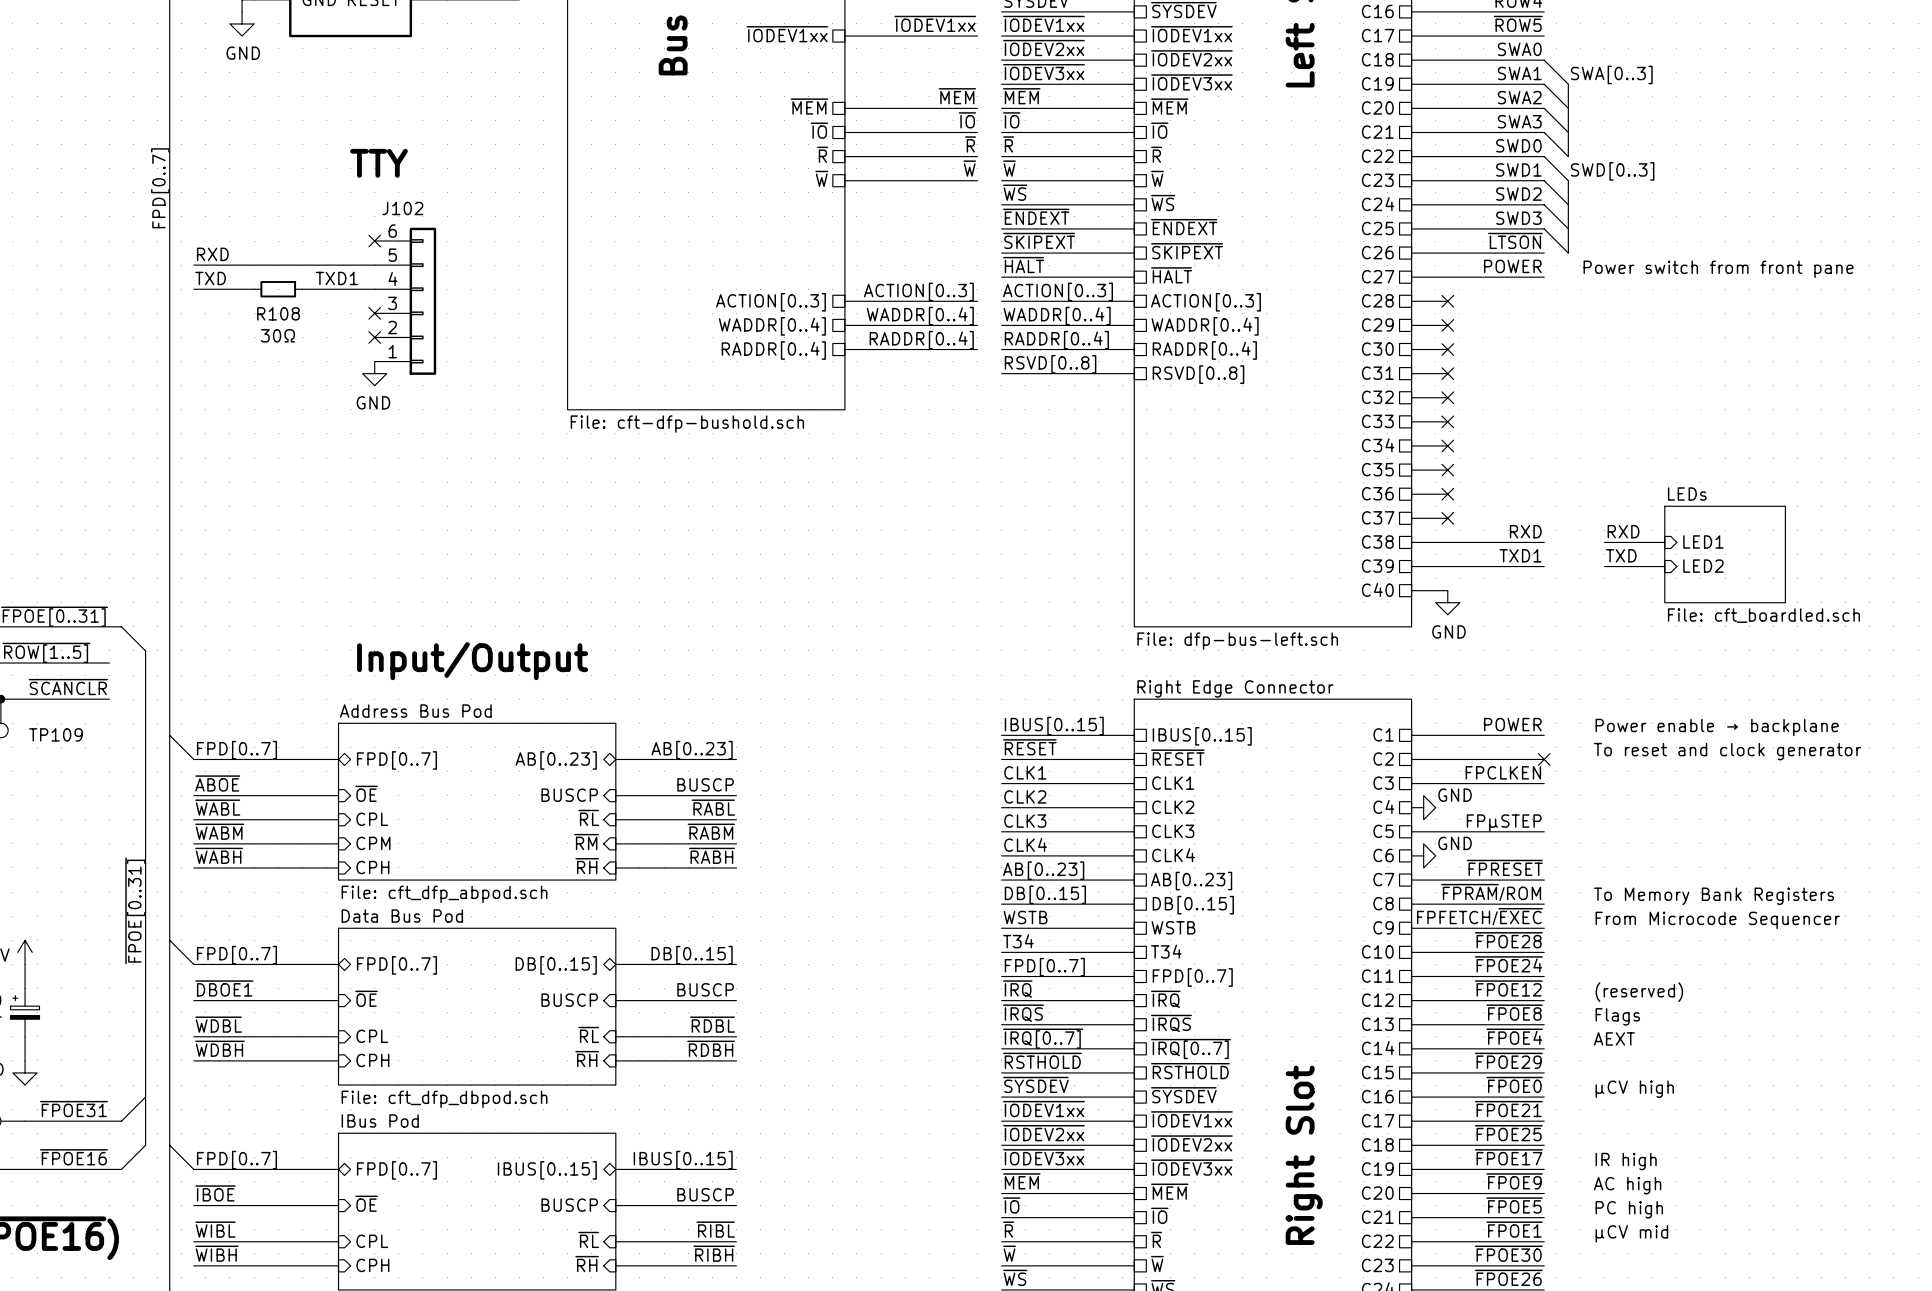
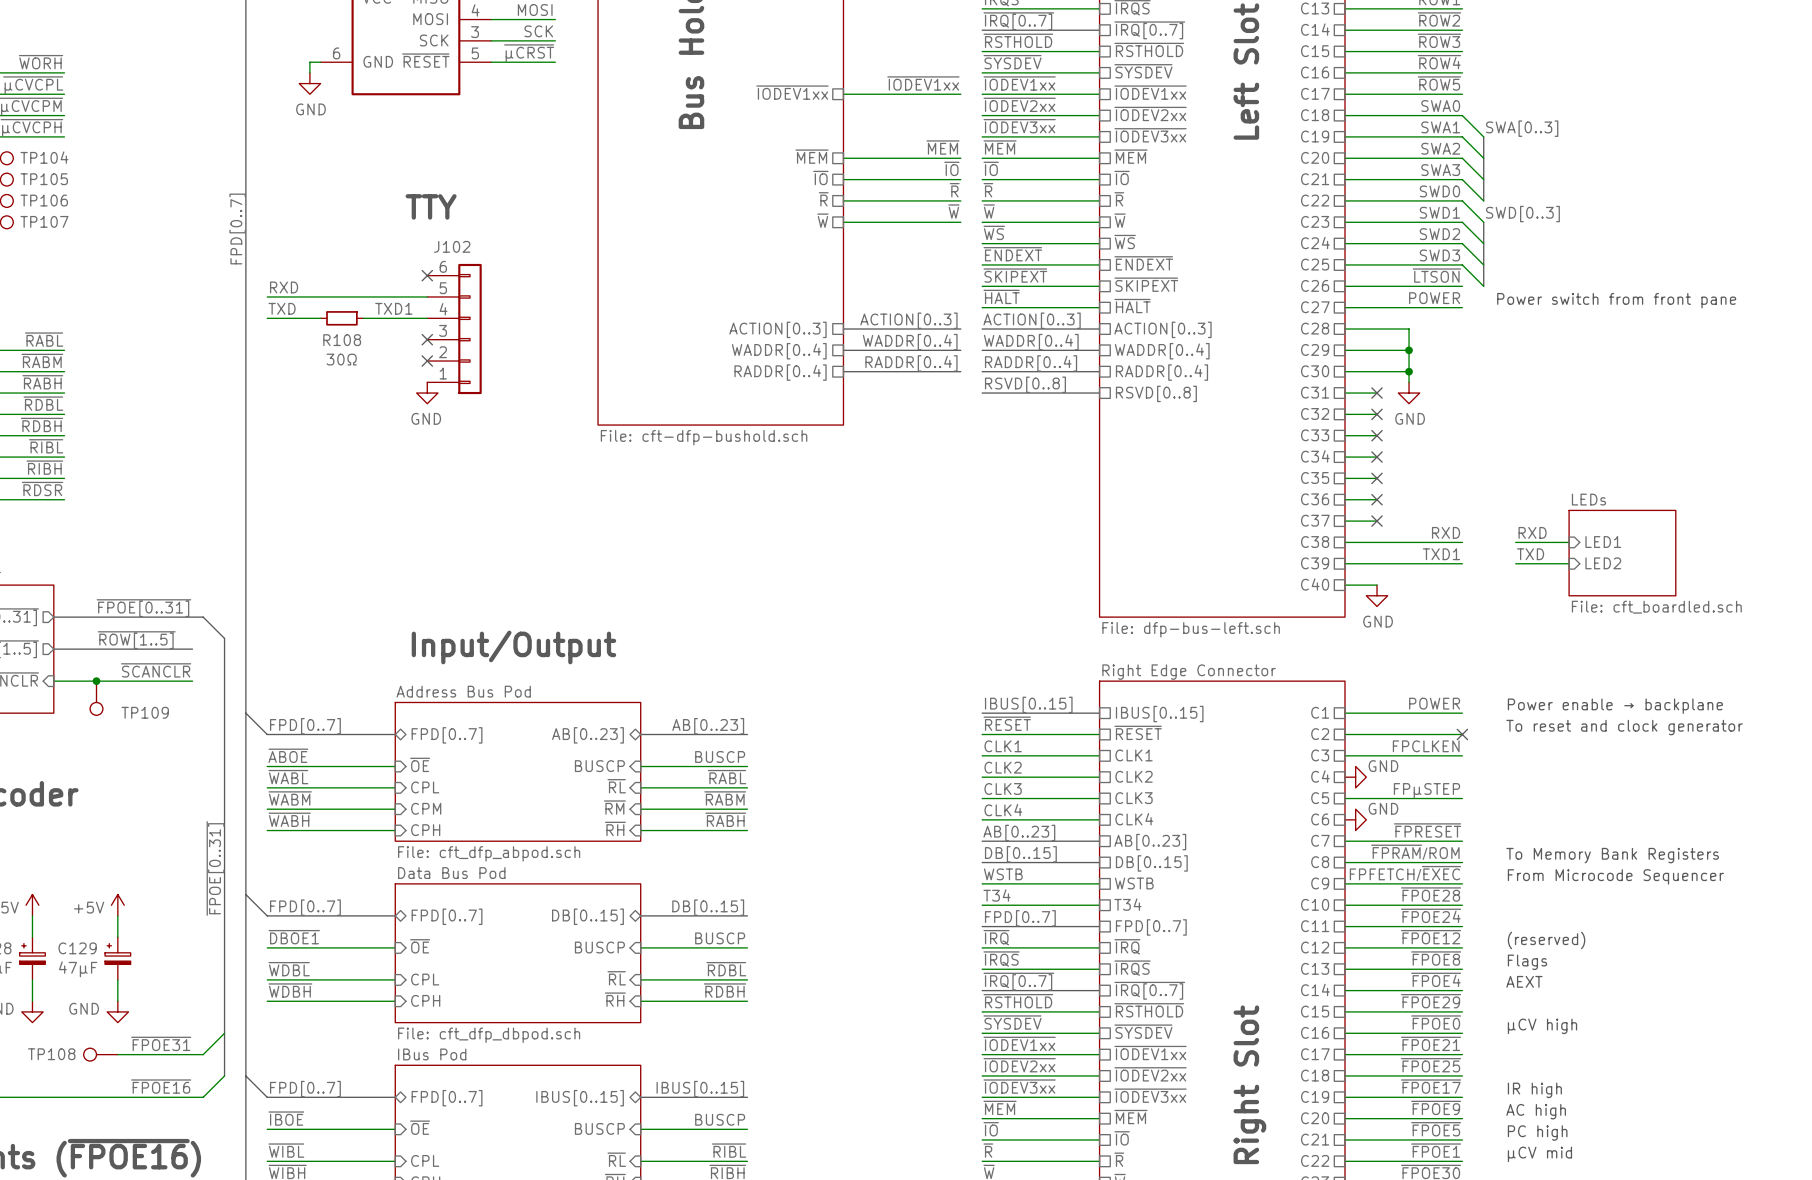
wire: none -> (1377, 329) (1409, 329) (1409, 382)
no-connect mark: (1447, 301) -> none
wire: none -> (1377, 350) (1409, 350)
no-connect mark: (1447, 325) -> none
junction: none -> (1409, 350)
wire: none -> (1377, 371) (1409, 371)
no-connect mark: (1447, 349) -> none
junction: none -> (1409, 371)
power symbol: none -> GND (1409, 393)

